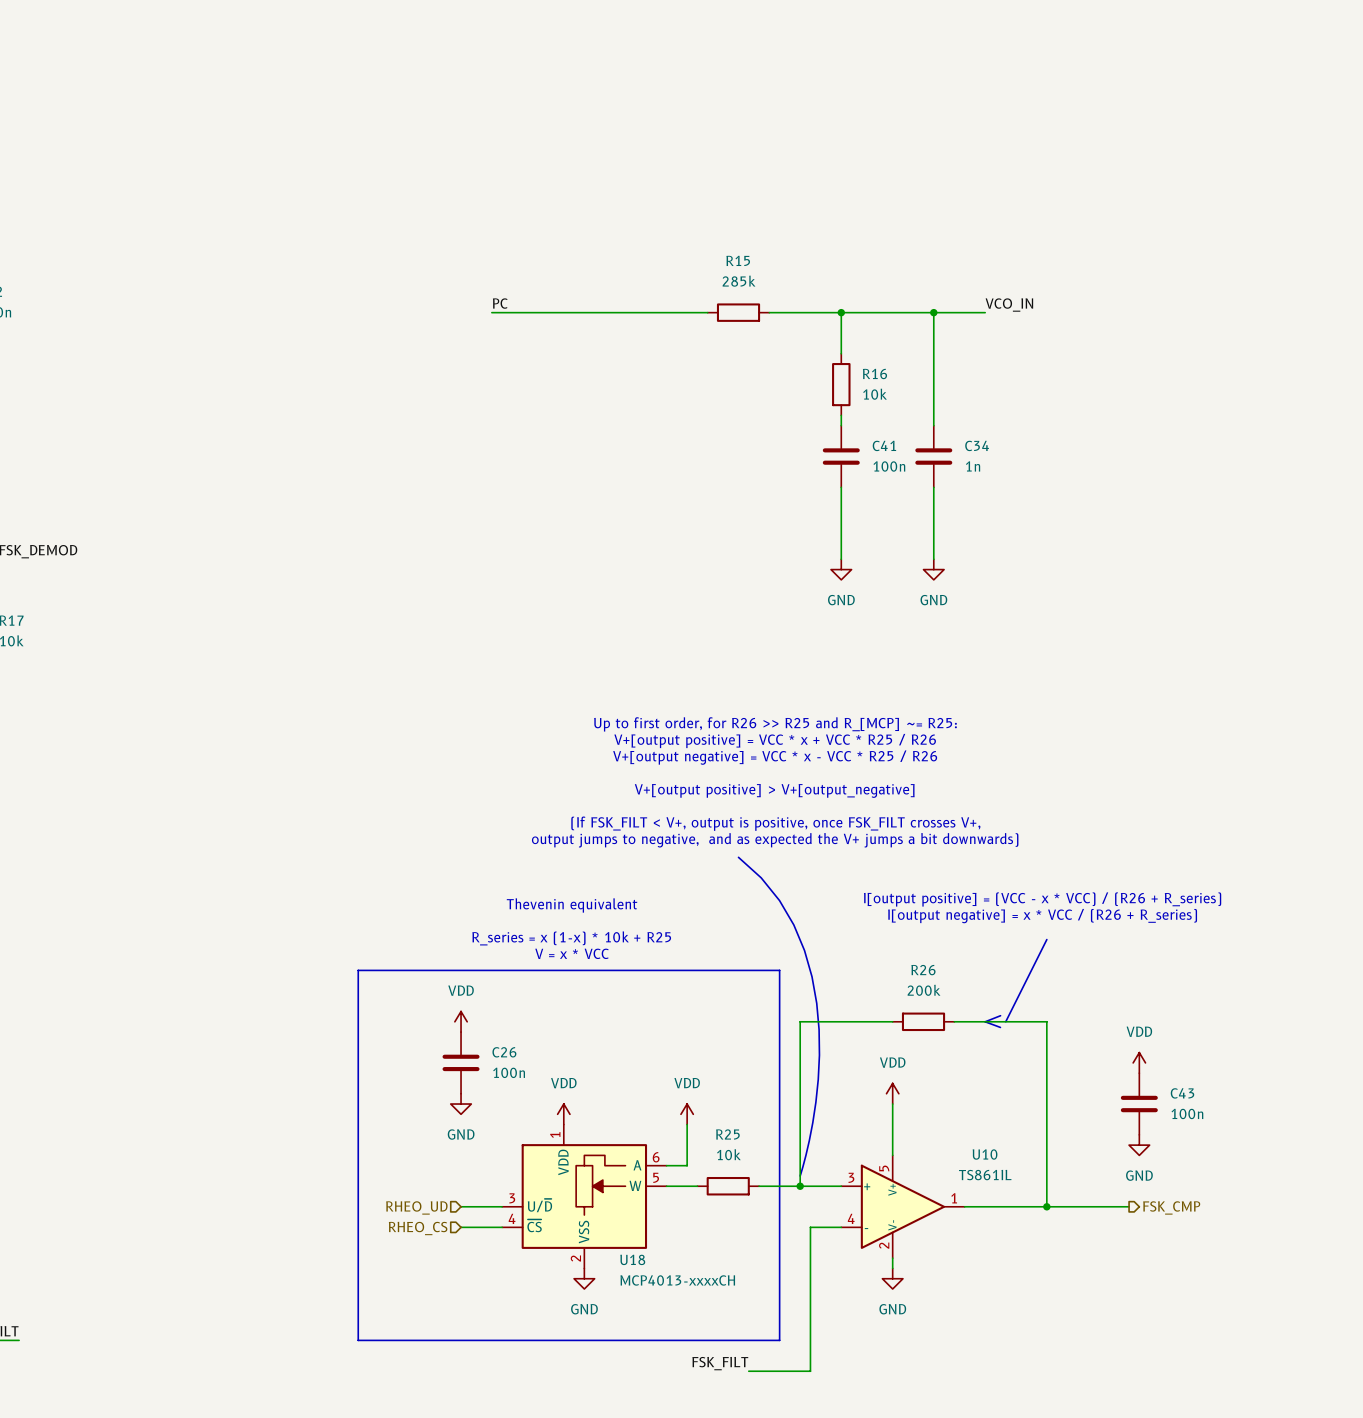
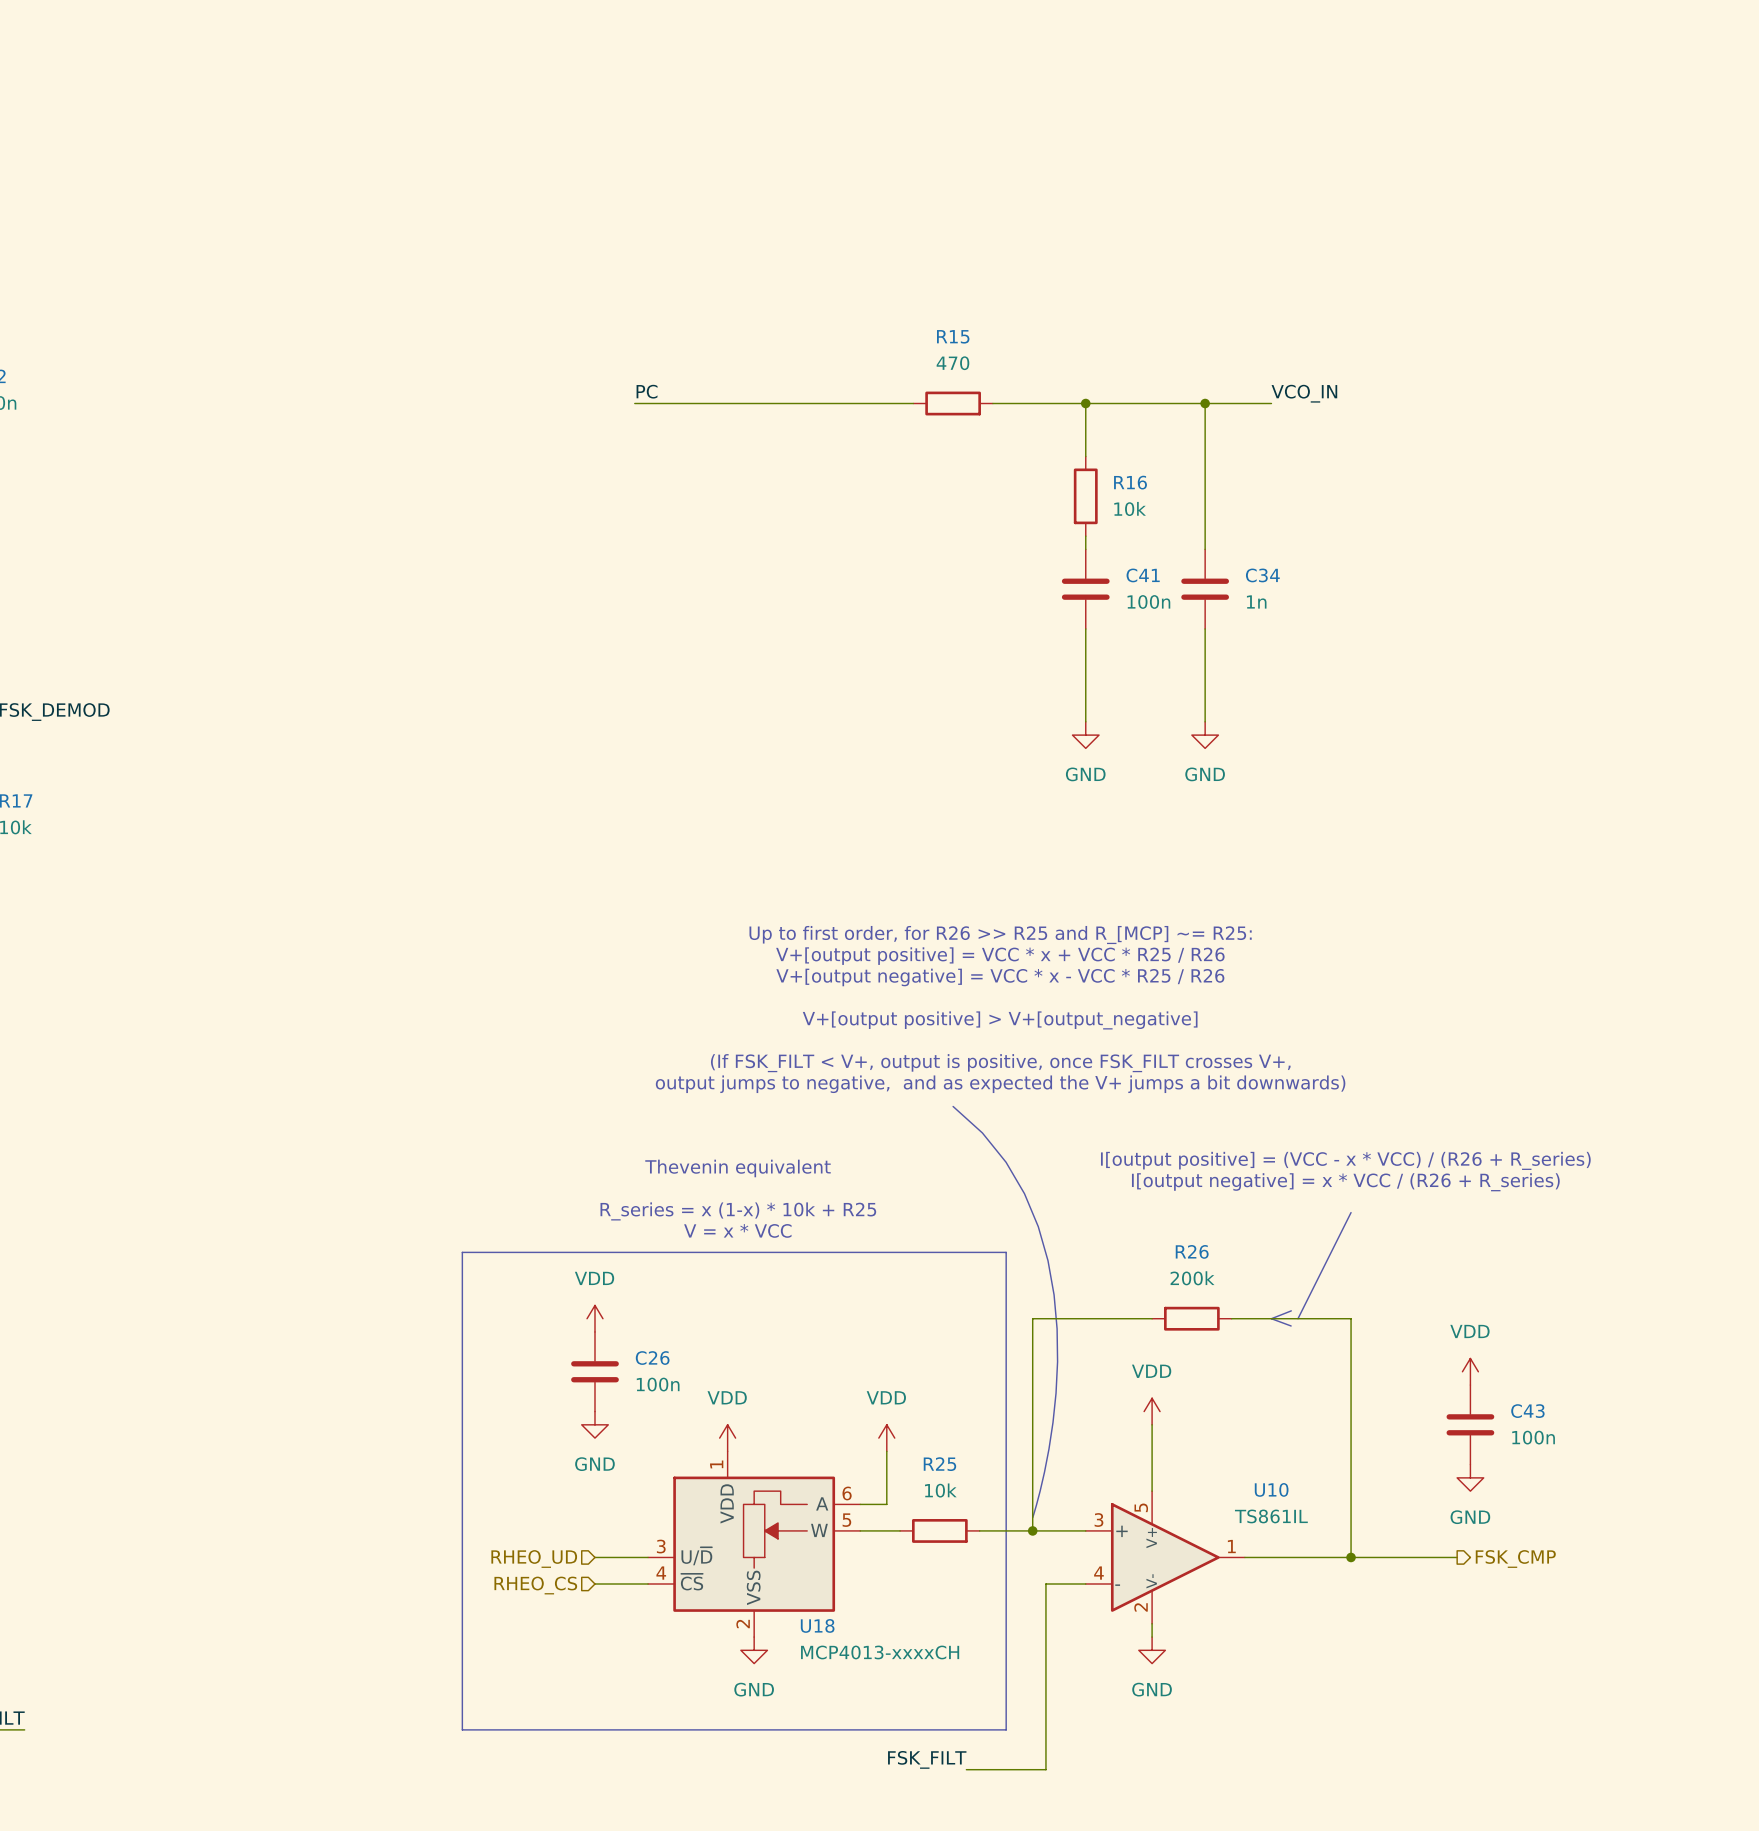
R15 value: 285k (739, 281) -> 470 (952, 363)

